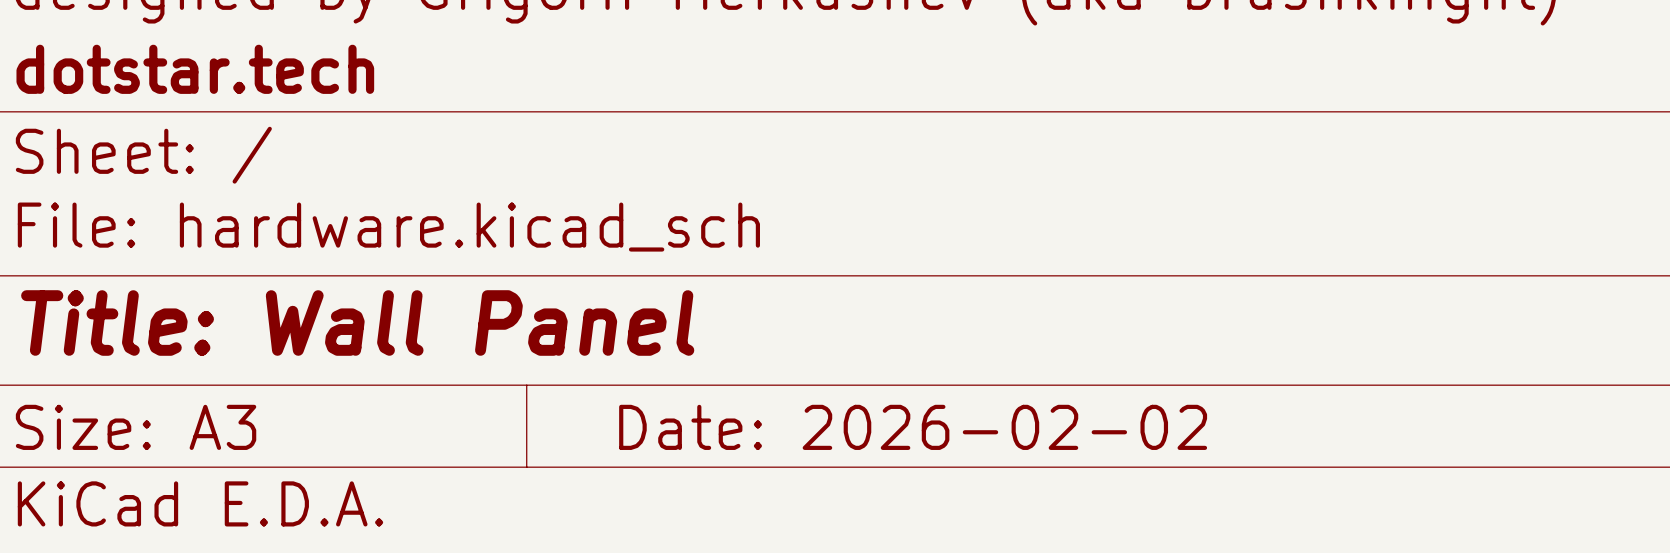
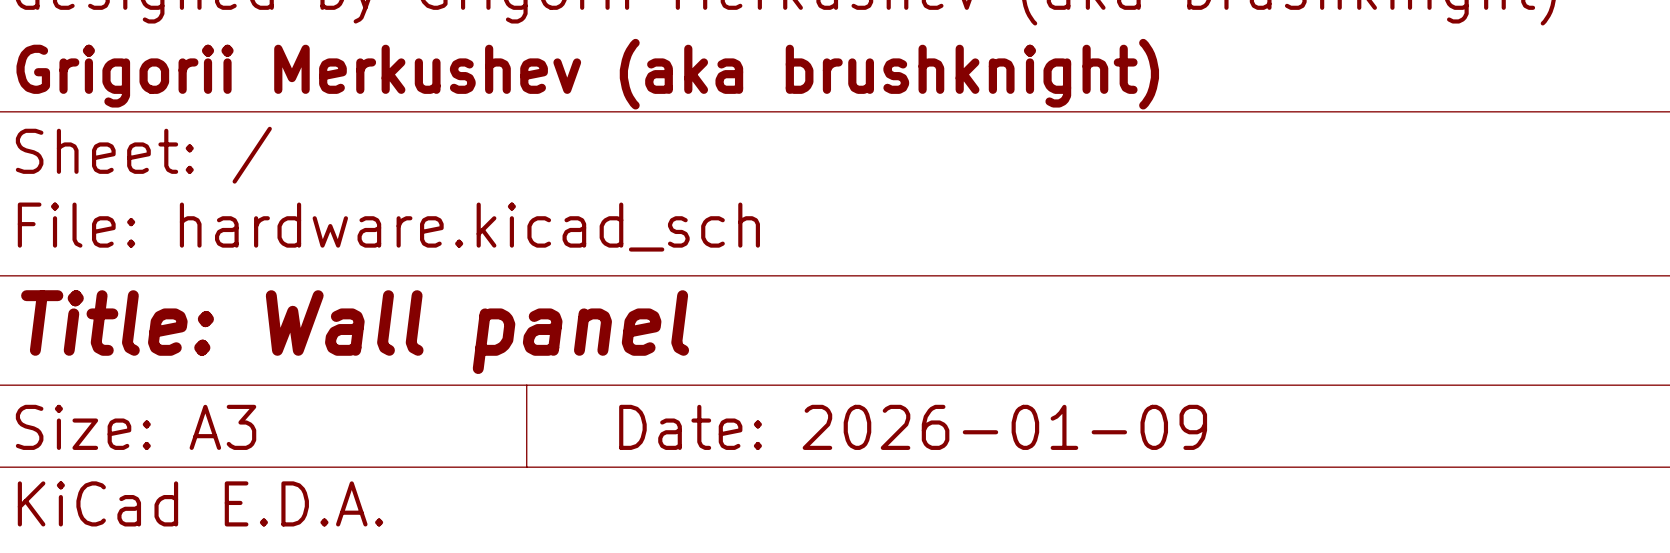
title block: dotstar.tech (195, 69) -> Grigorii Merkushev (aka brushknight) (587, 74)
title block: Title: Wall Panel (357, 323) -> Title: Wall panel (355, 332)
title block: Date: 2026-02-02 (913, 427) -> Date: 2026-01-09 (913, 427)

